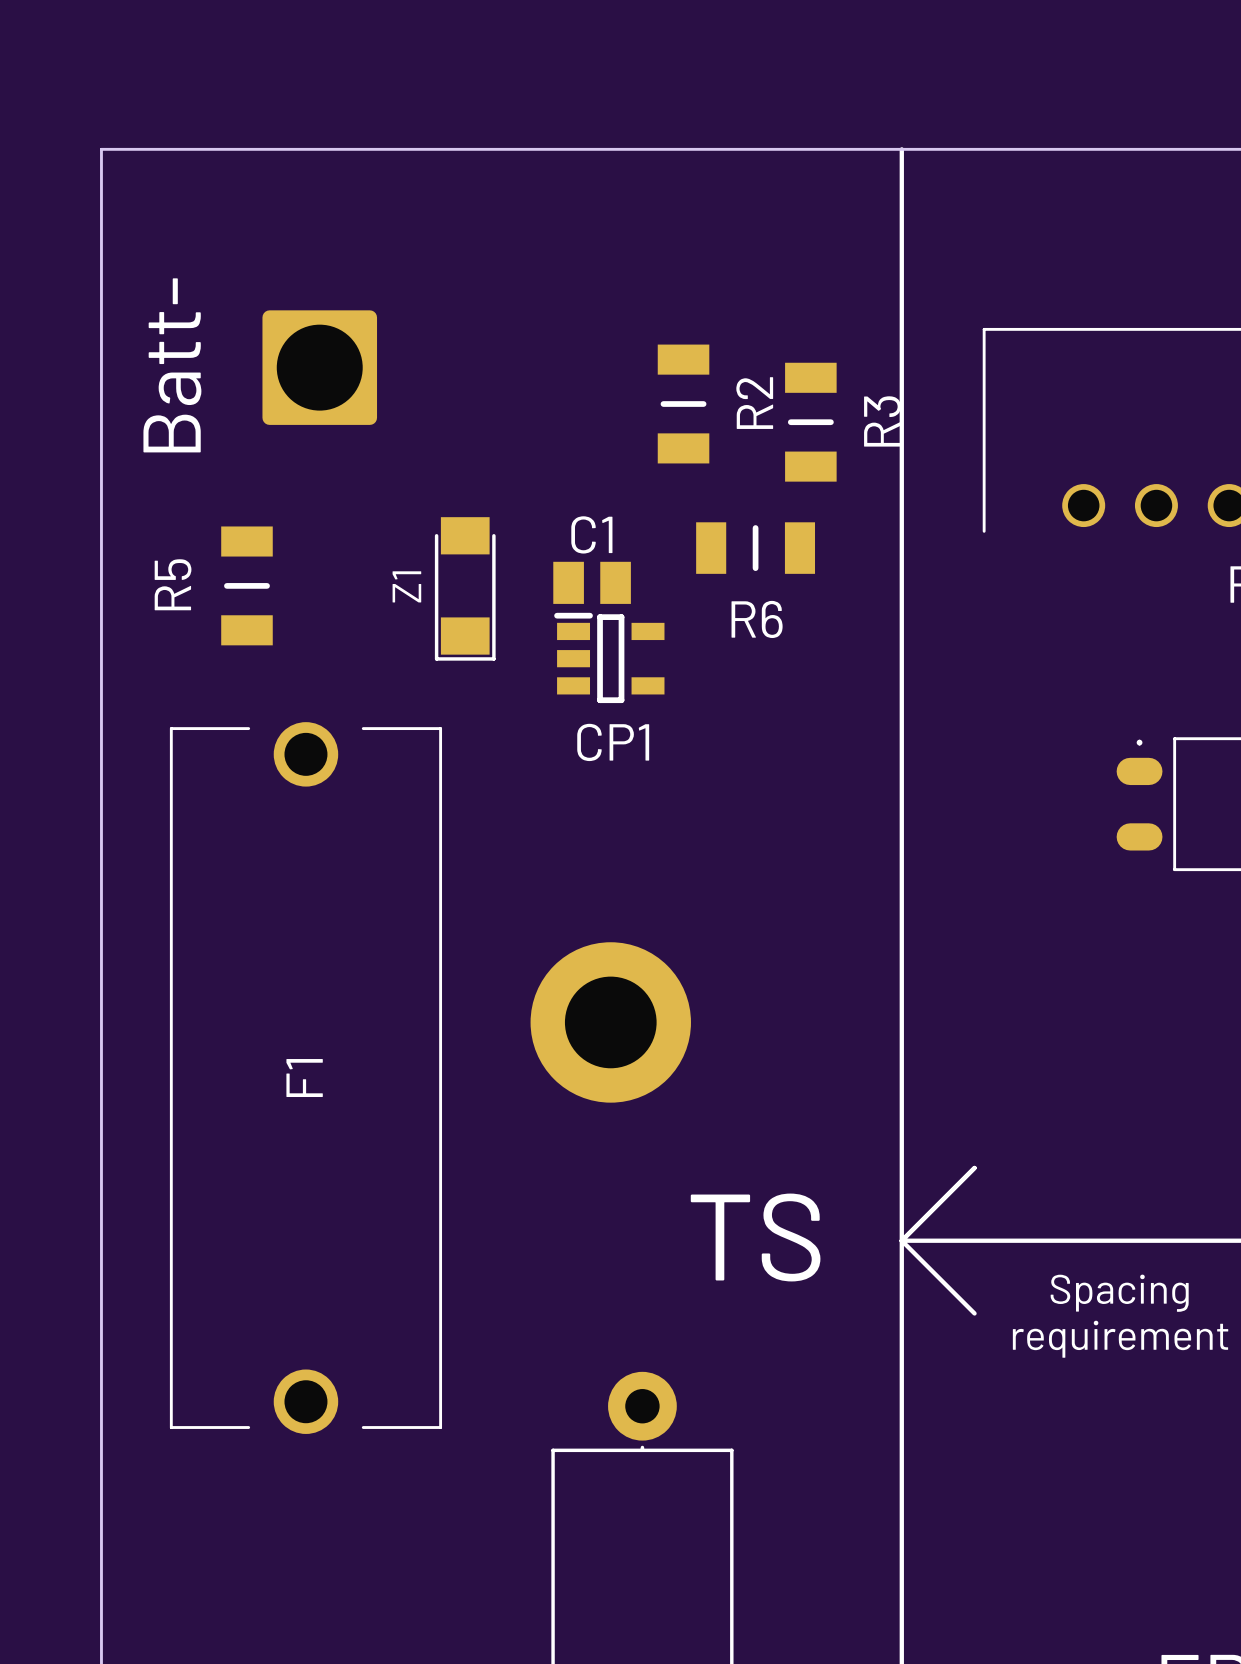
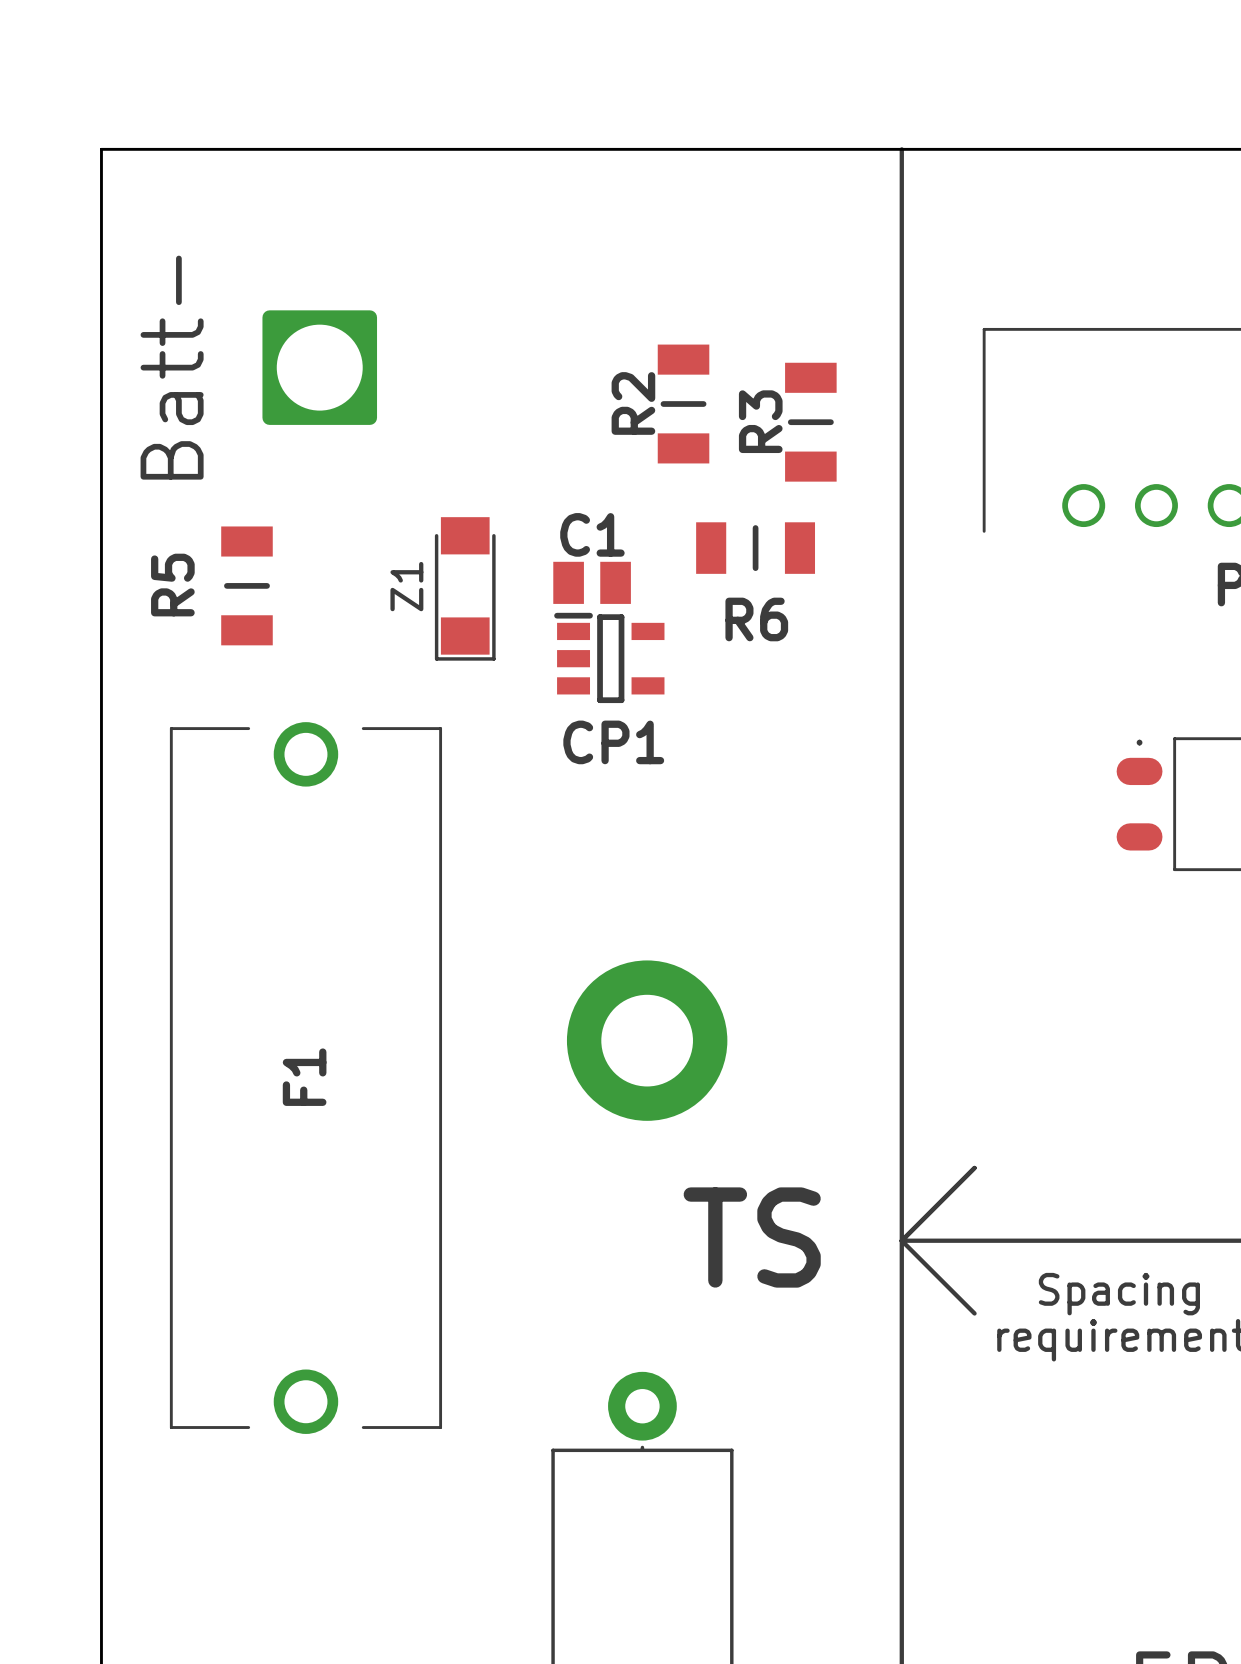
R2 name position: R2 (754, 403) -> R2 (633, 403)
R3 name position: R3 (882, 421) -> R3 (760, 421)
part position: (610, 1022) -> (647, 1040)

